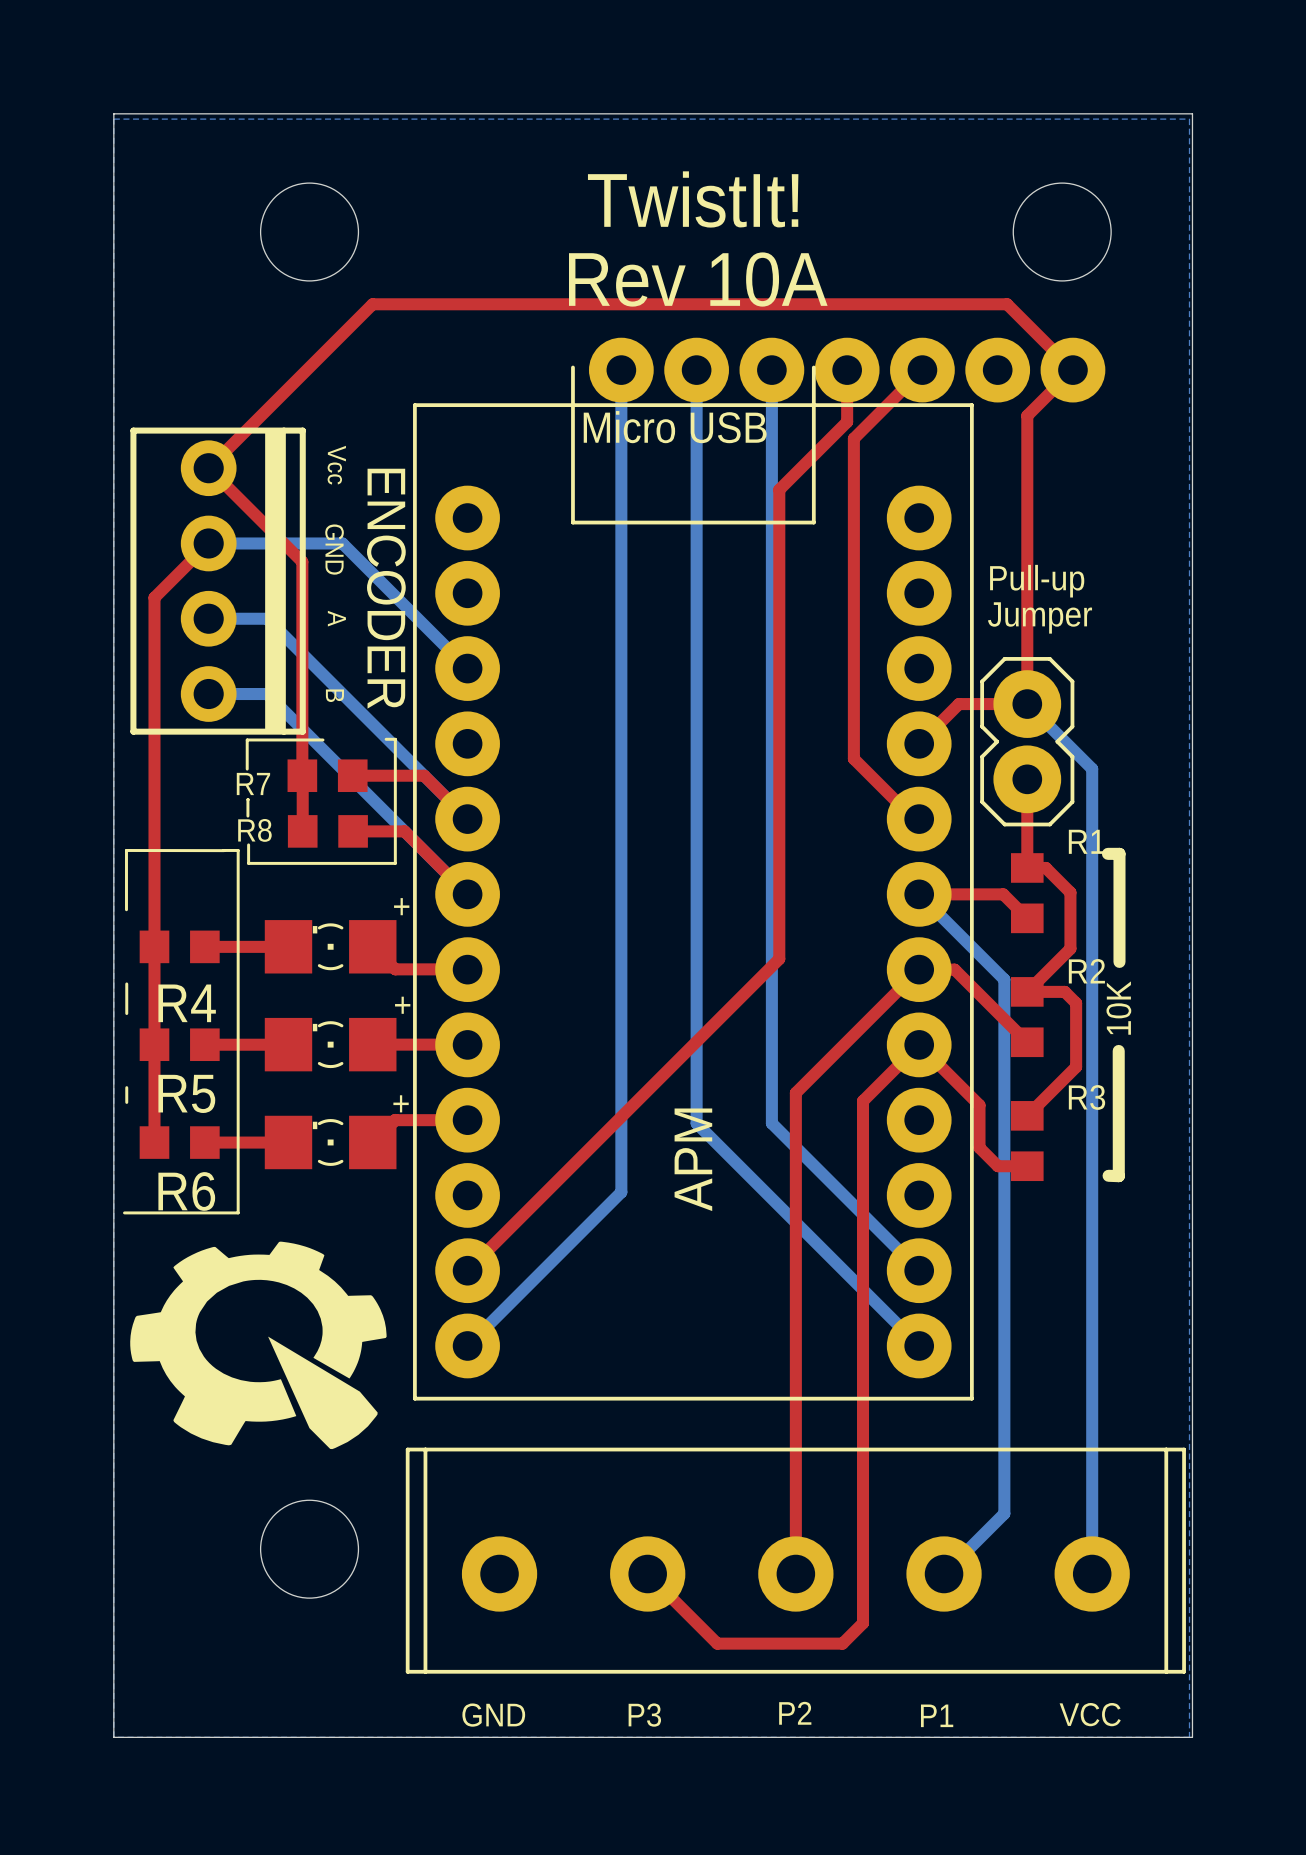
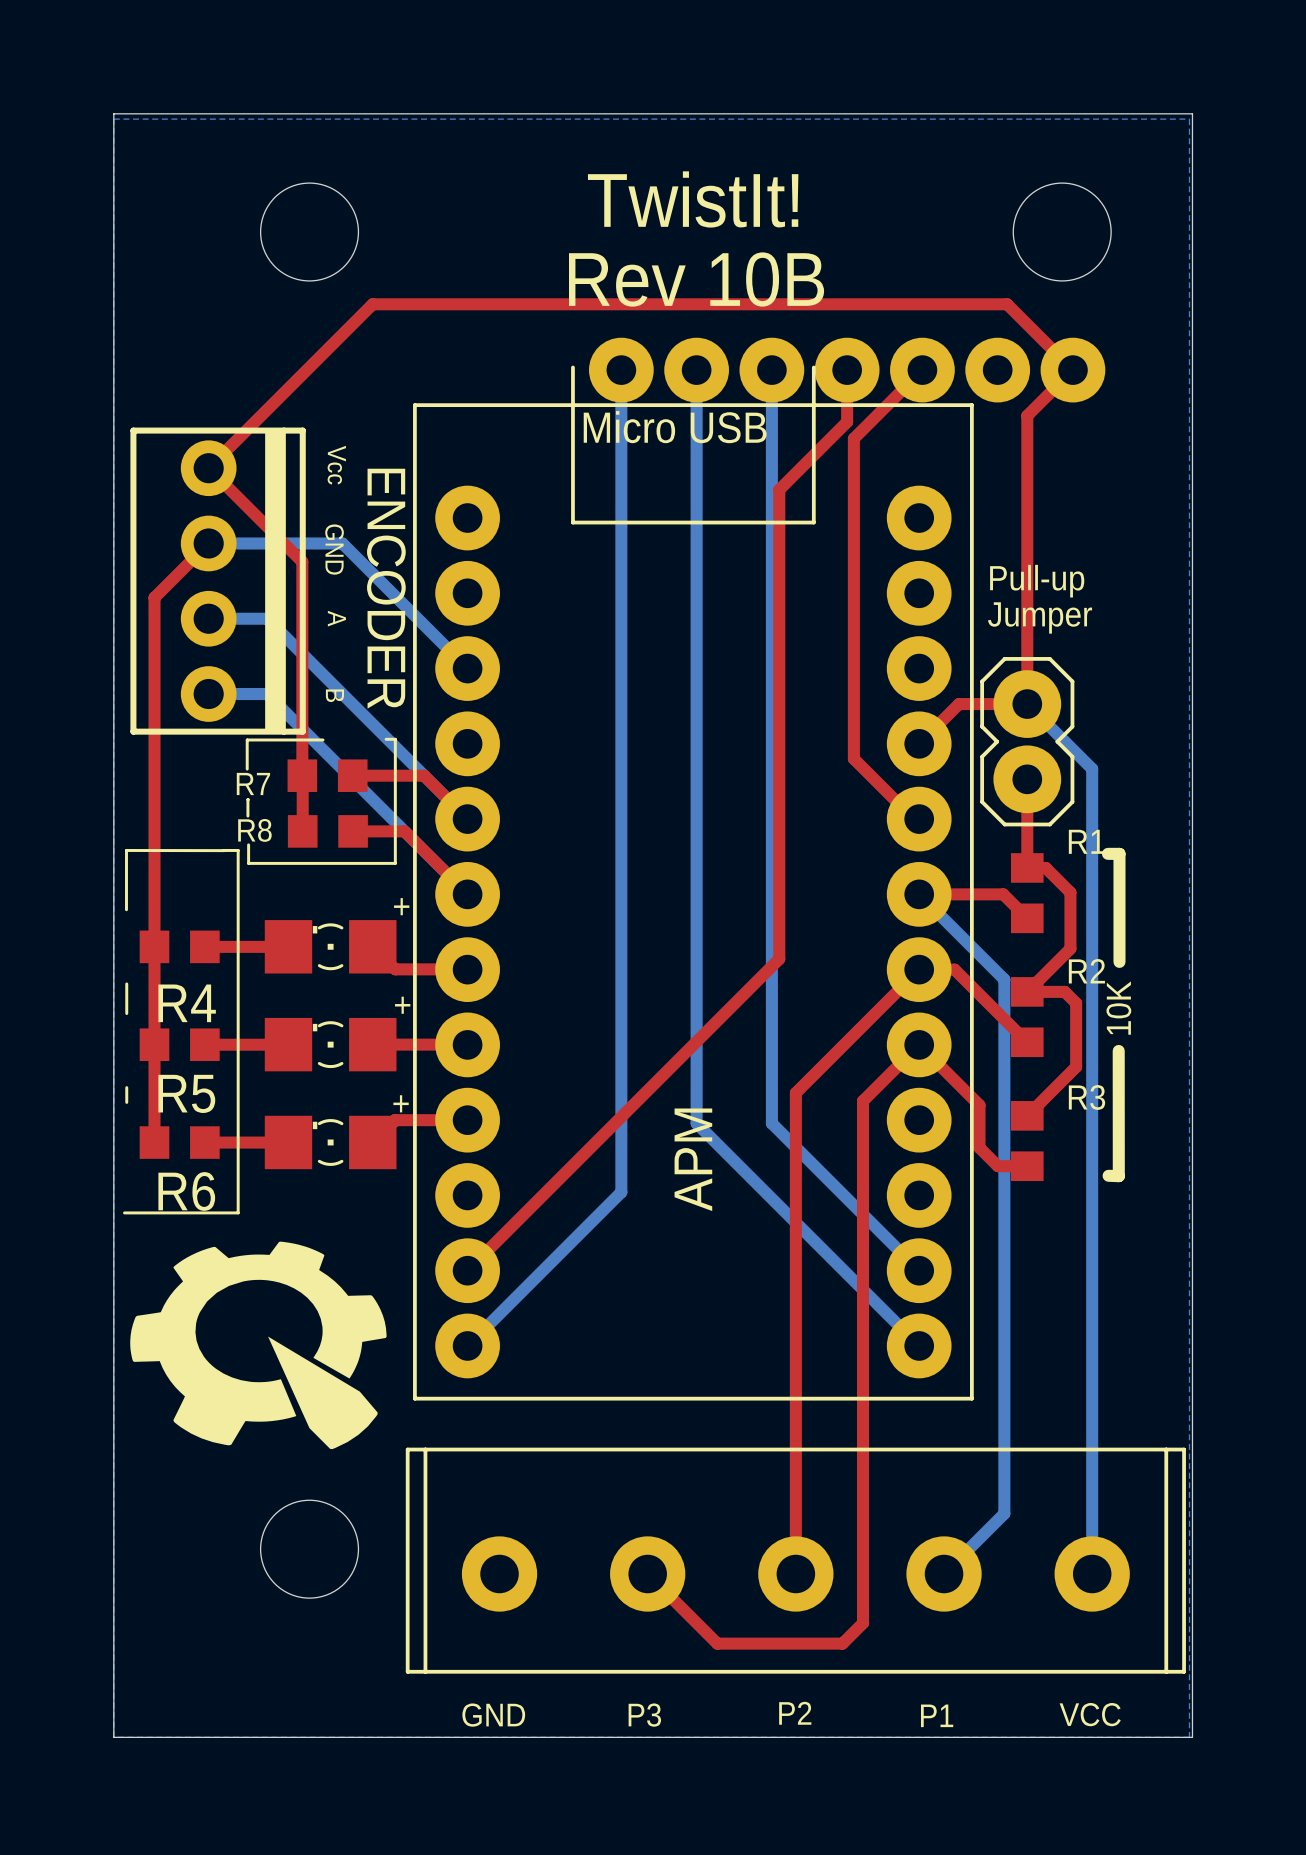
text: Rev 10A (698, 279) -> Rev 10B (696, 279)

